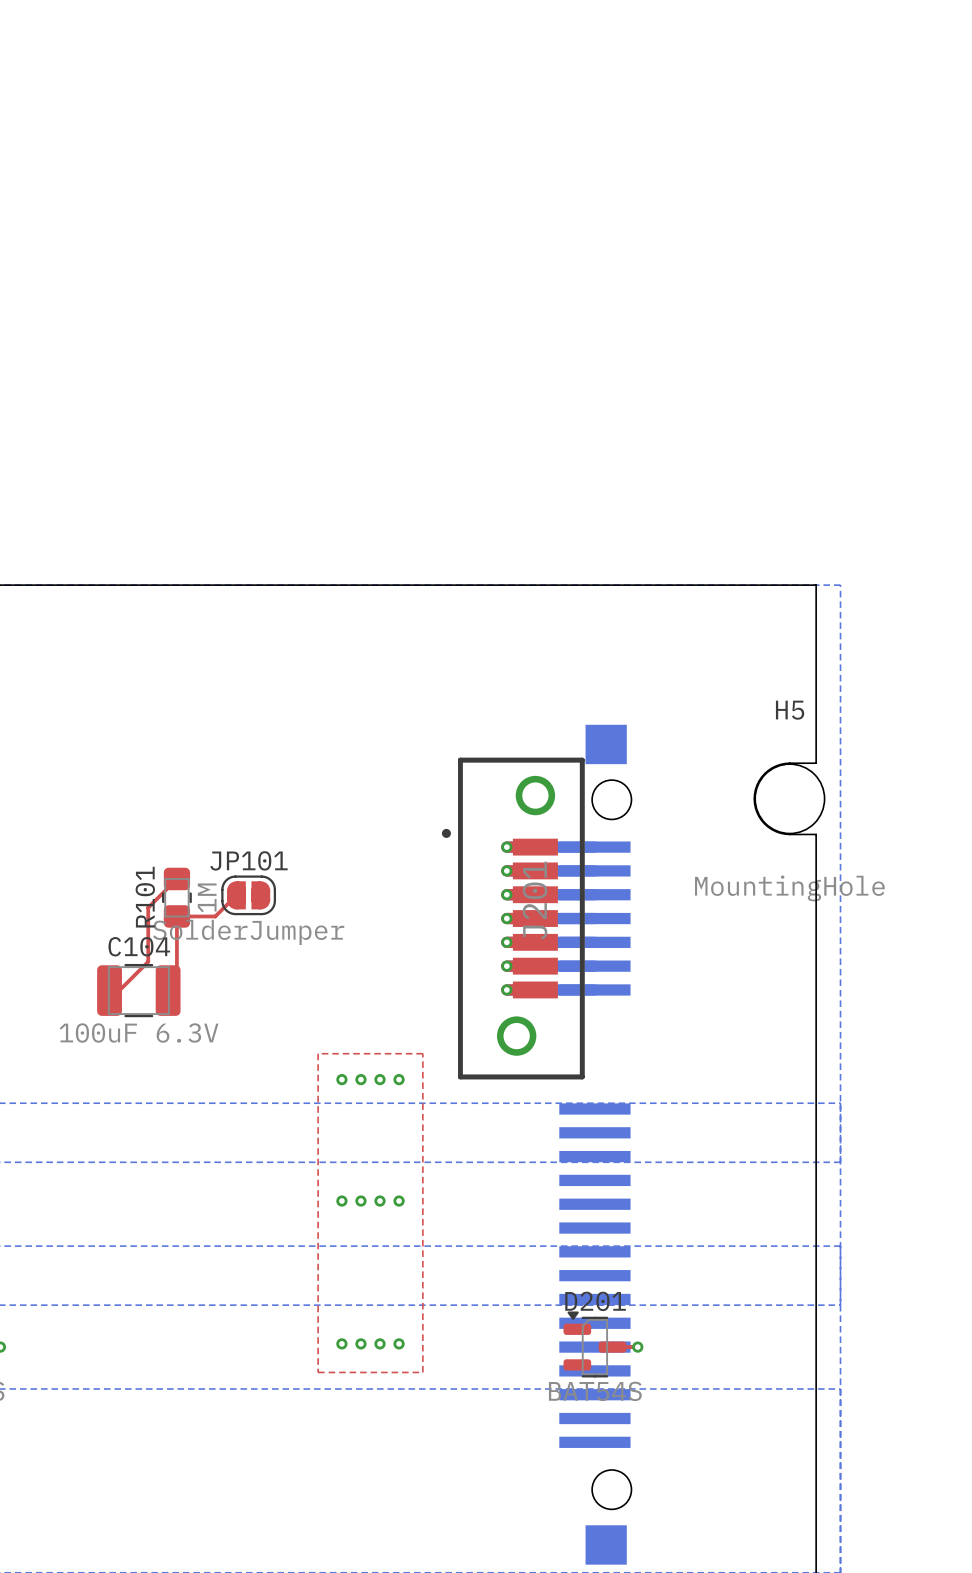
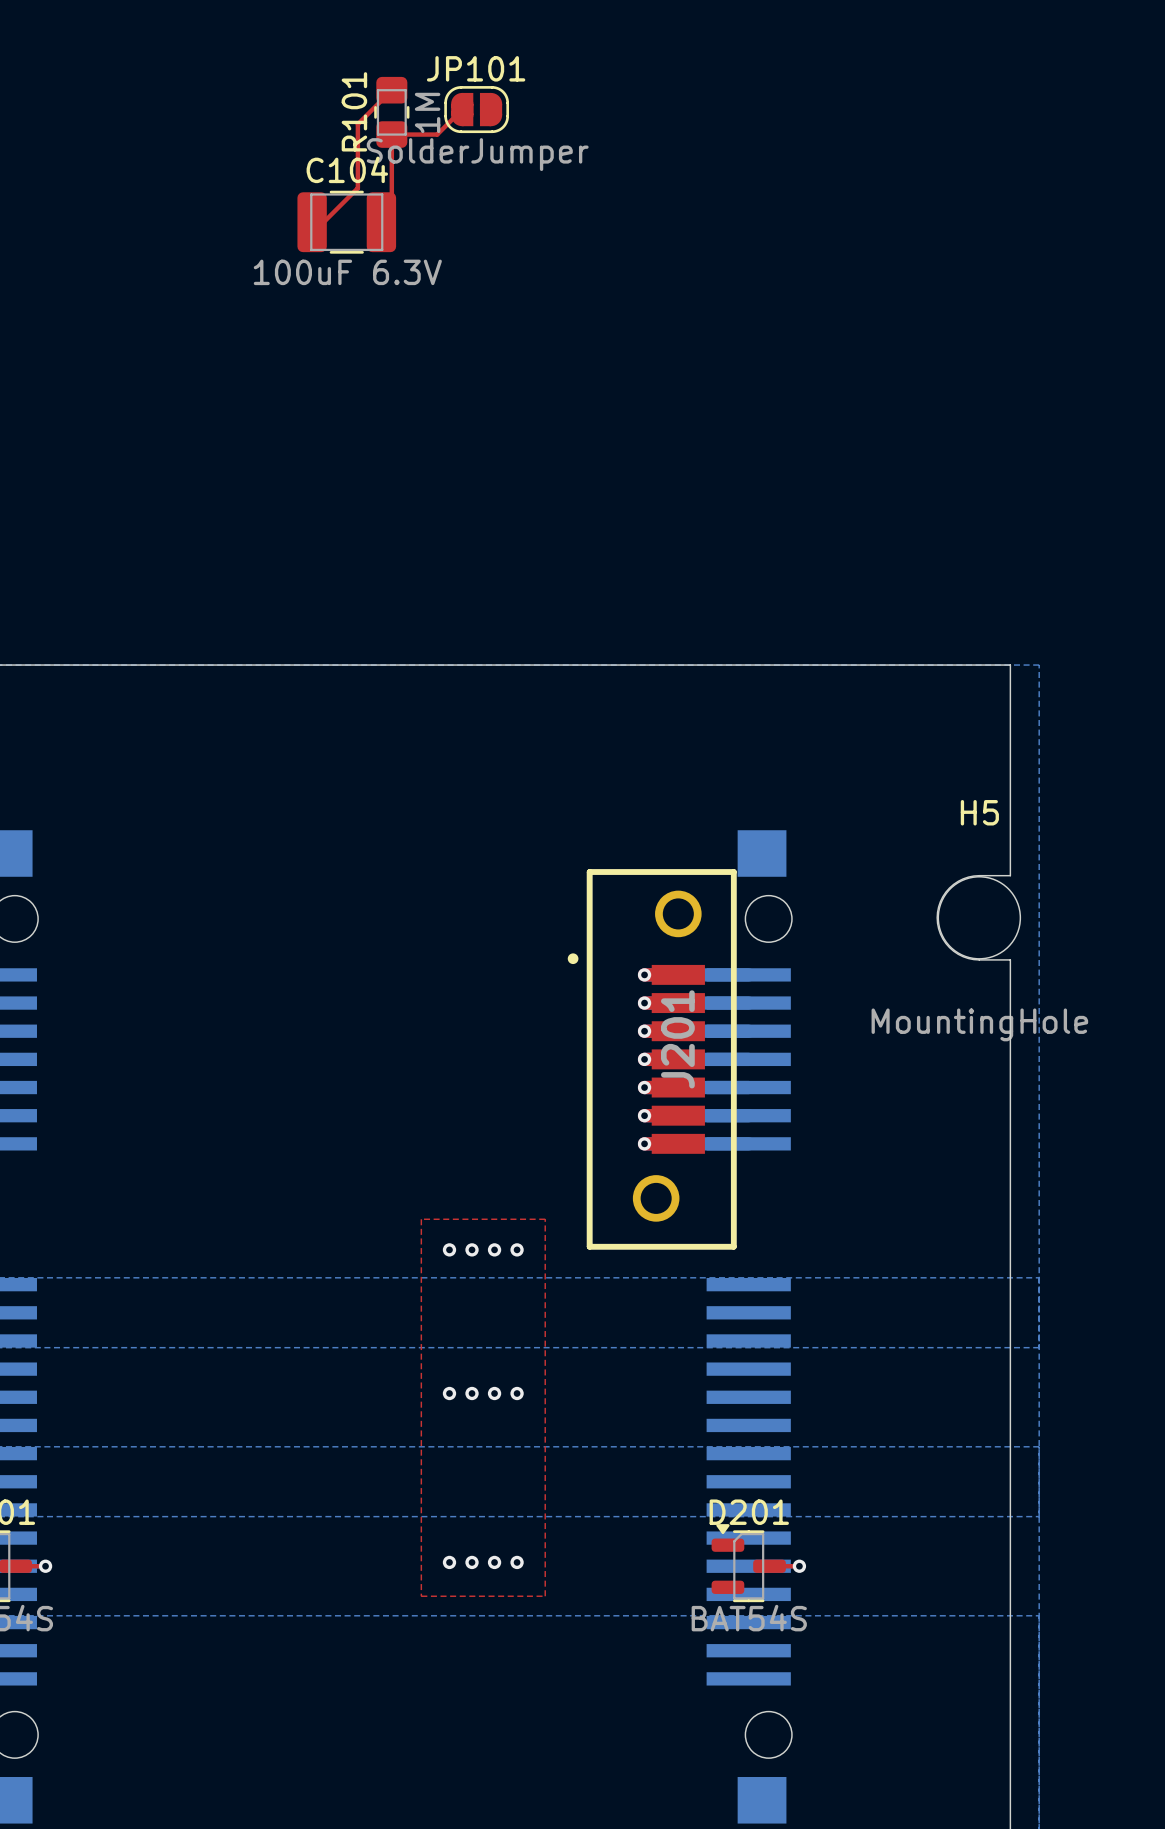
top track: none -> (391, 90) (357, 124) (357, 188) (323, 222)
top track: none -> (462, 109) (437, 134) (391, 134) (391, 200) (369, 222)
top track: (176, 878) (148, 907) (148, 961) (119, 990) -> none
top track: (236, 895) (215, 916) (176, 916) (176, 971) (158, 990) -> none
JP101 position: (248, 895) -> (476, 109)
R101 position: (176, 897) -> (391, 112)
C104 position: (138, 990) -> (346, 222)

